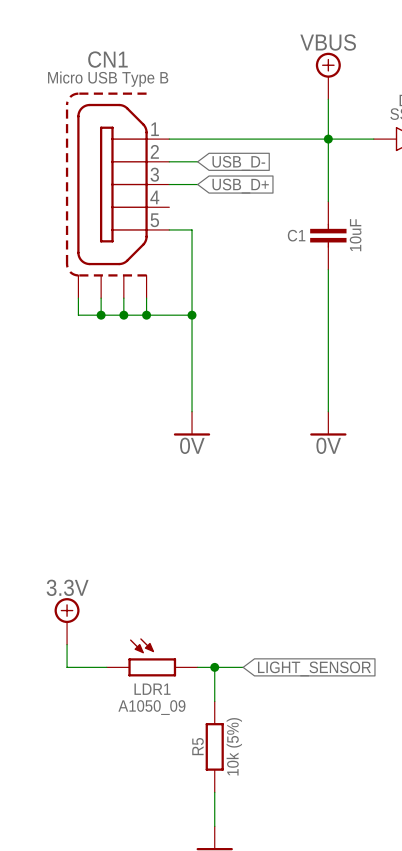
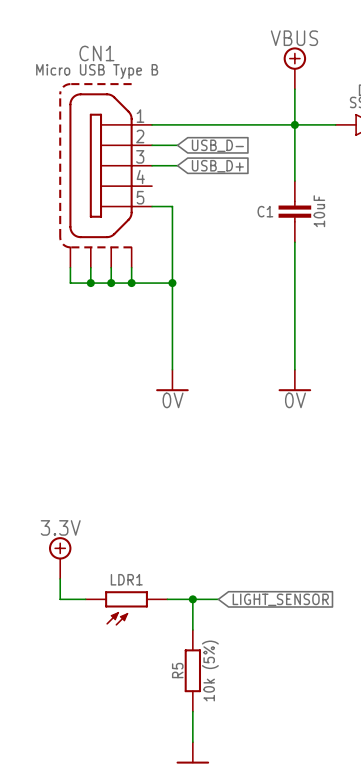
LDR1 flip: as is (152, 657) -> up-down (126, 608)
LDR1 value: A1050_09 (151, 707) -> none

